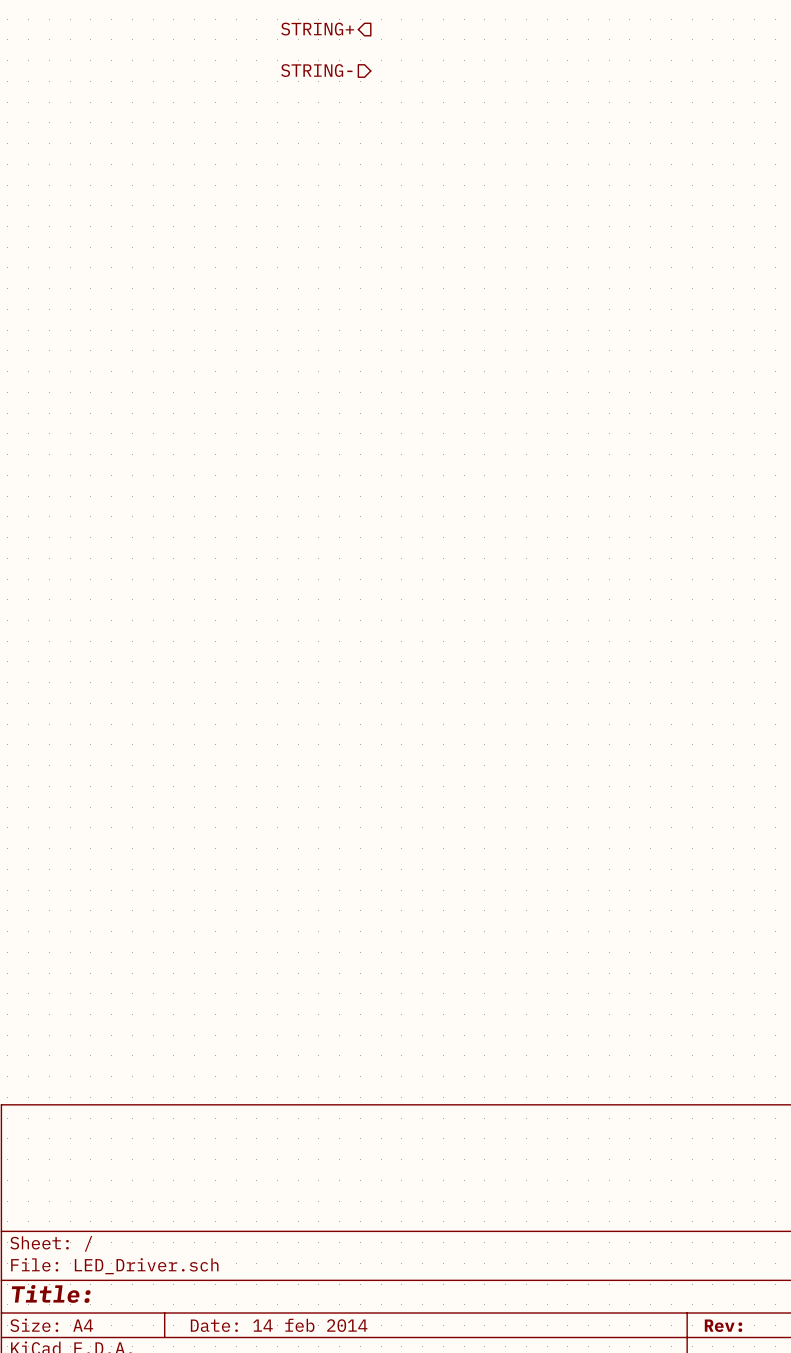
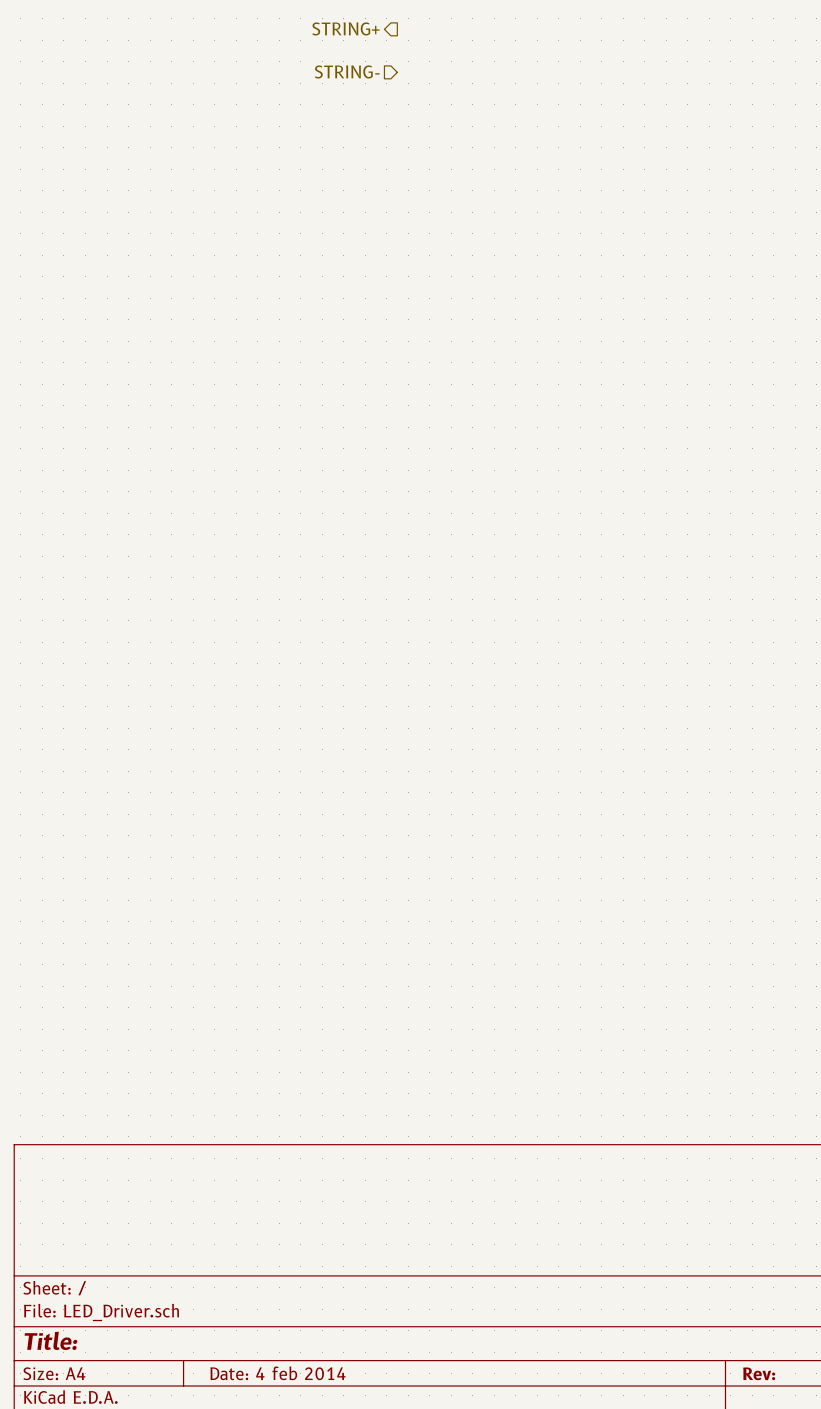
title block: Date: 14 feb 2014 (279, 1325) -> Date: 4 feb 2014 (277, 1373)

